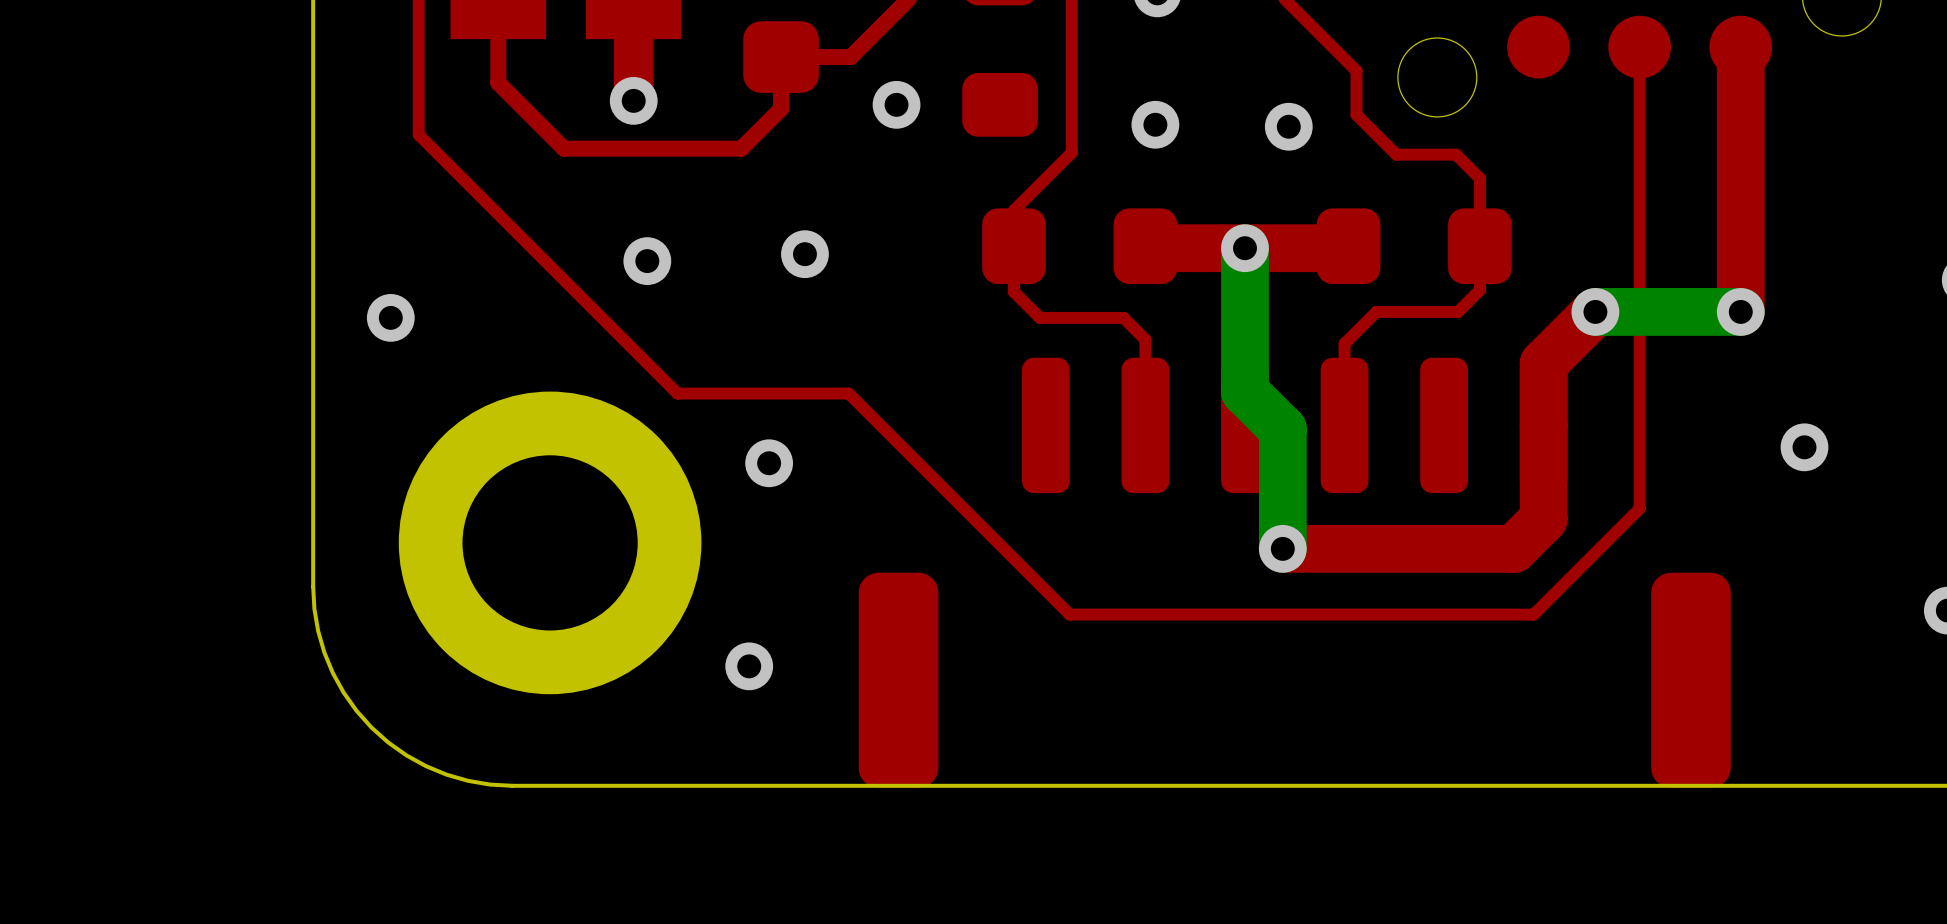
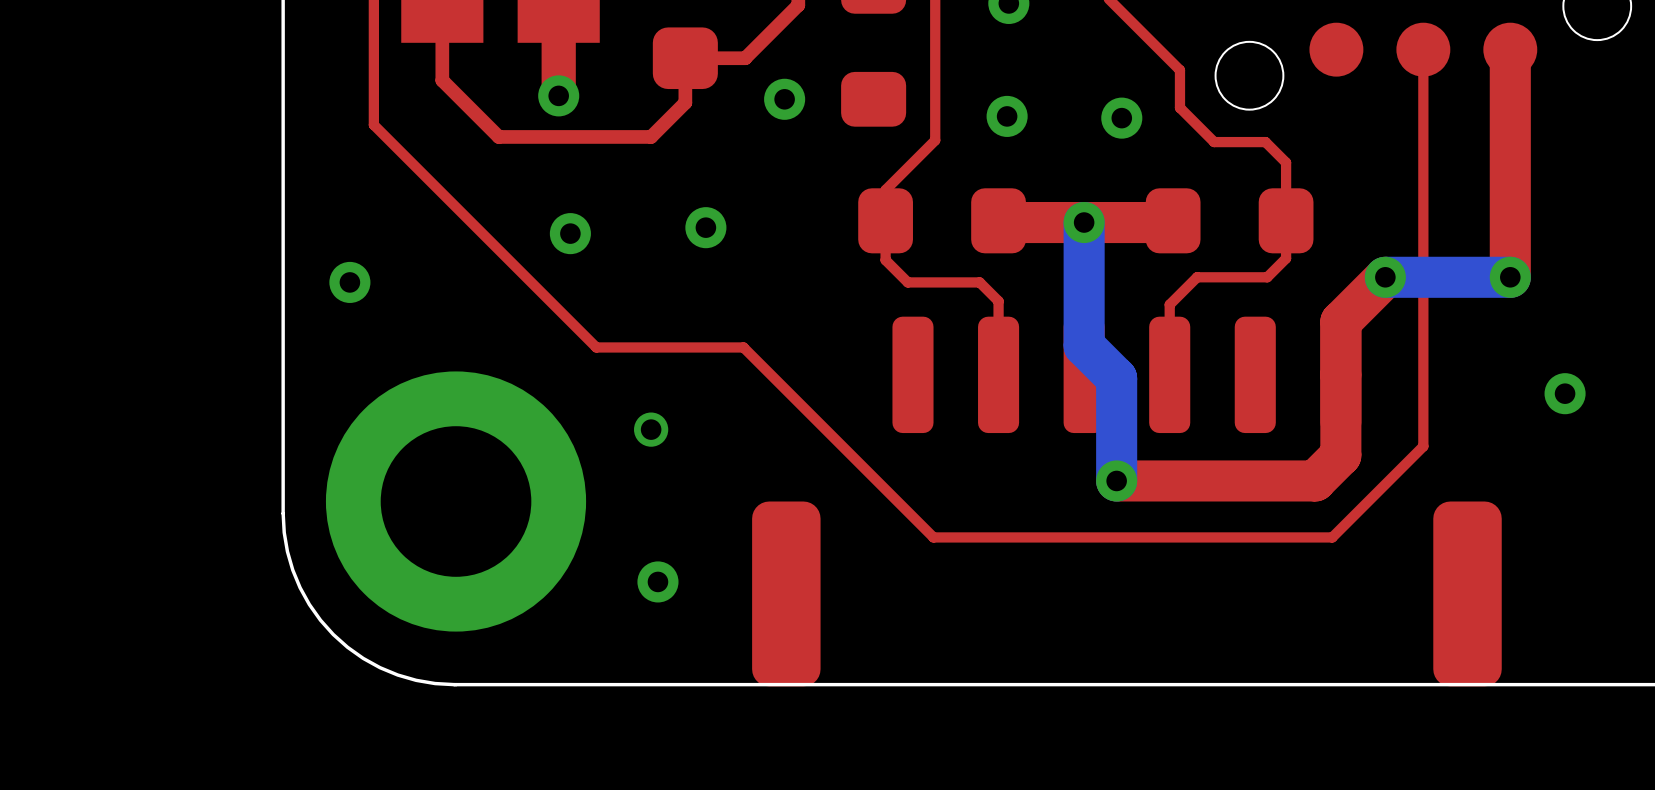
via position: (769, 463) -> (651, 429)
part position: (550, 542) -> (456, 501)

